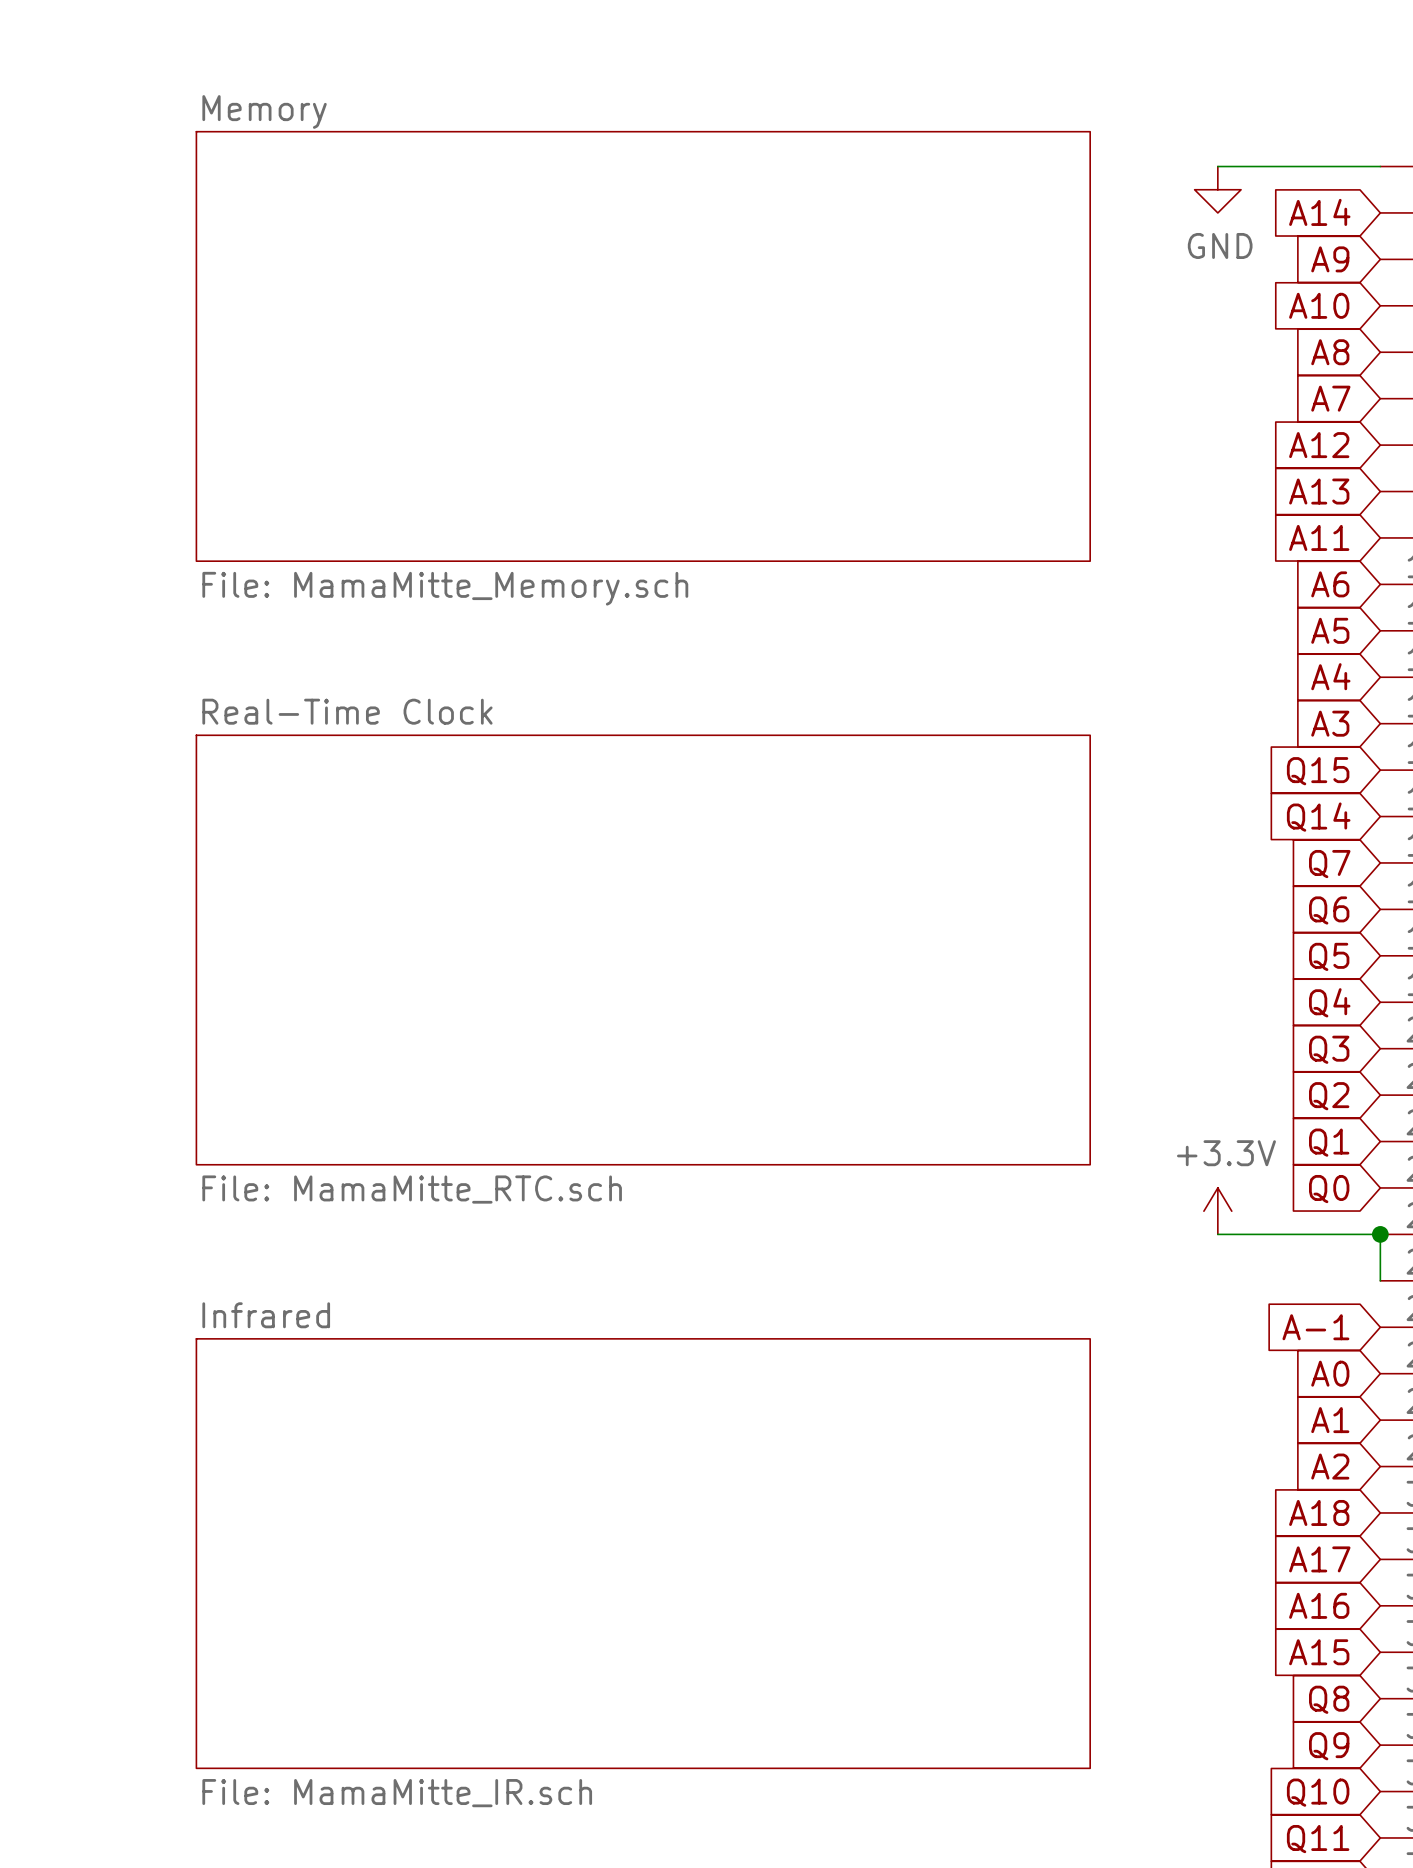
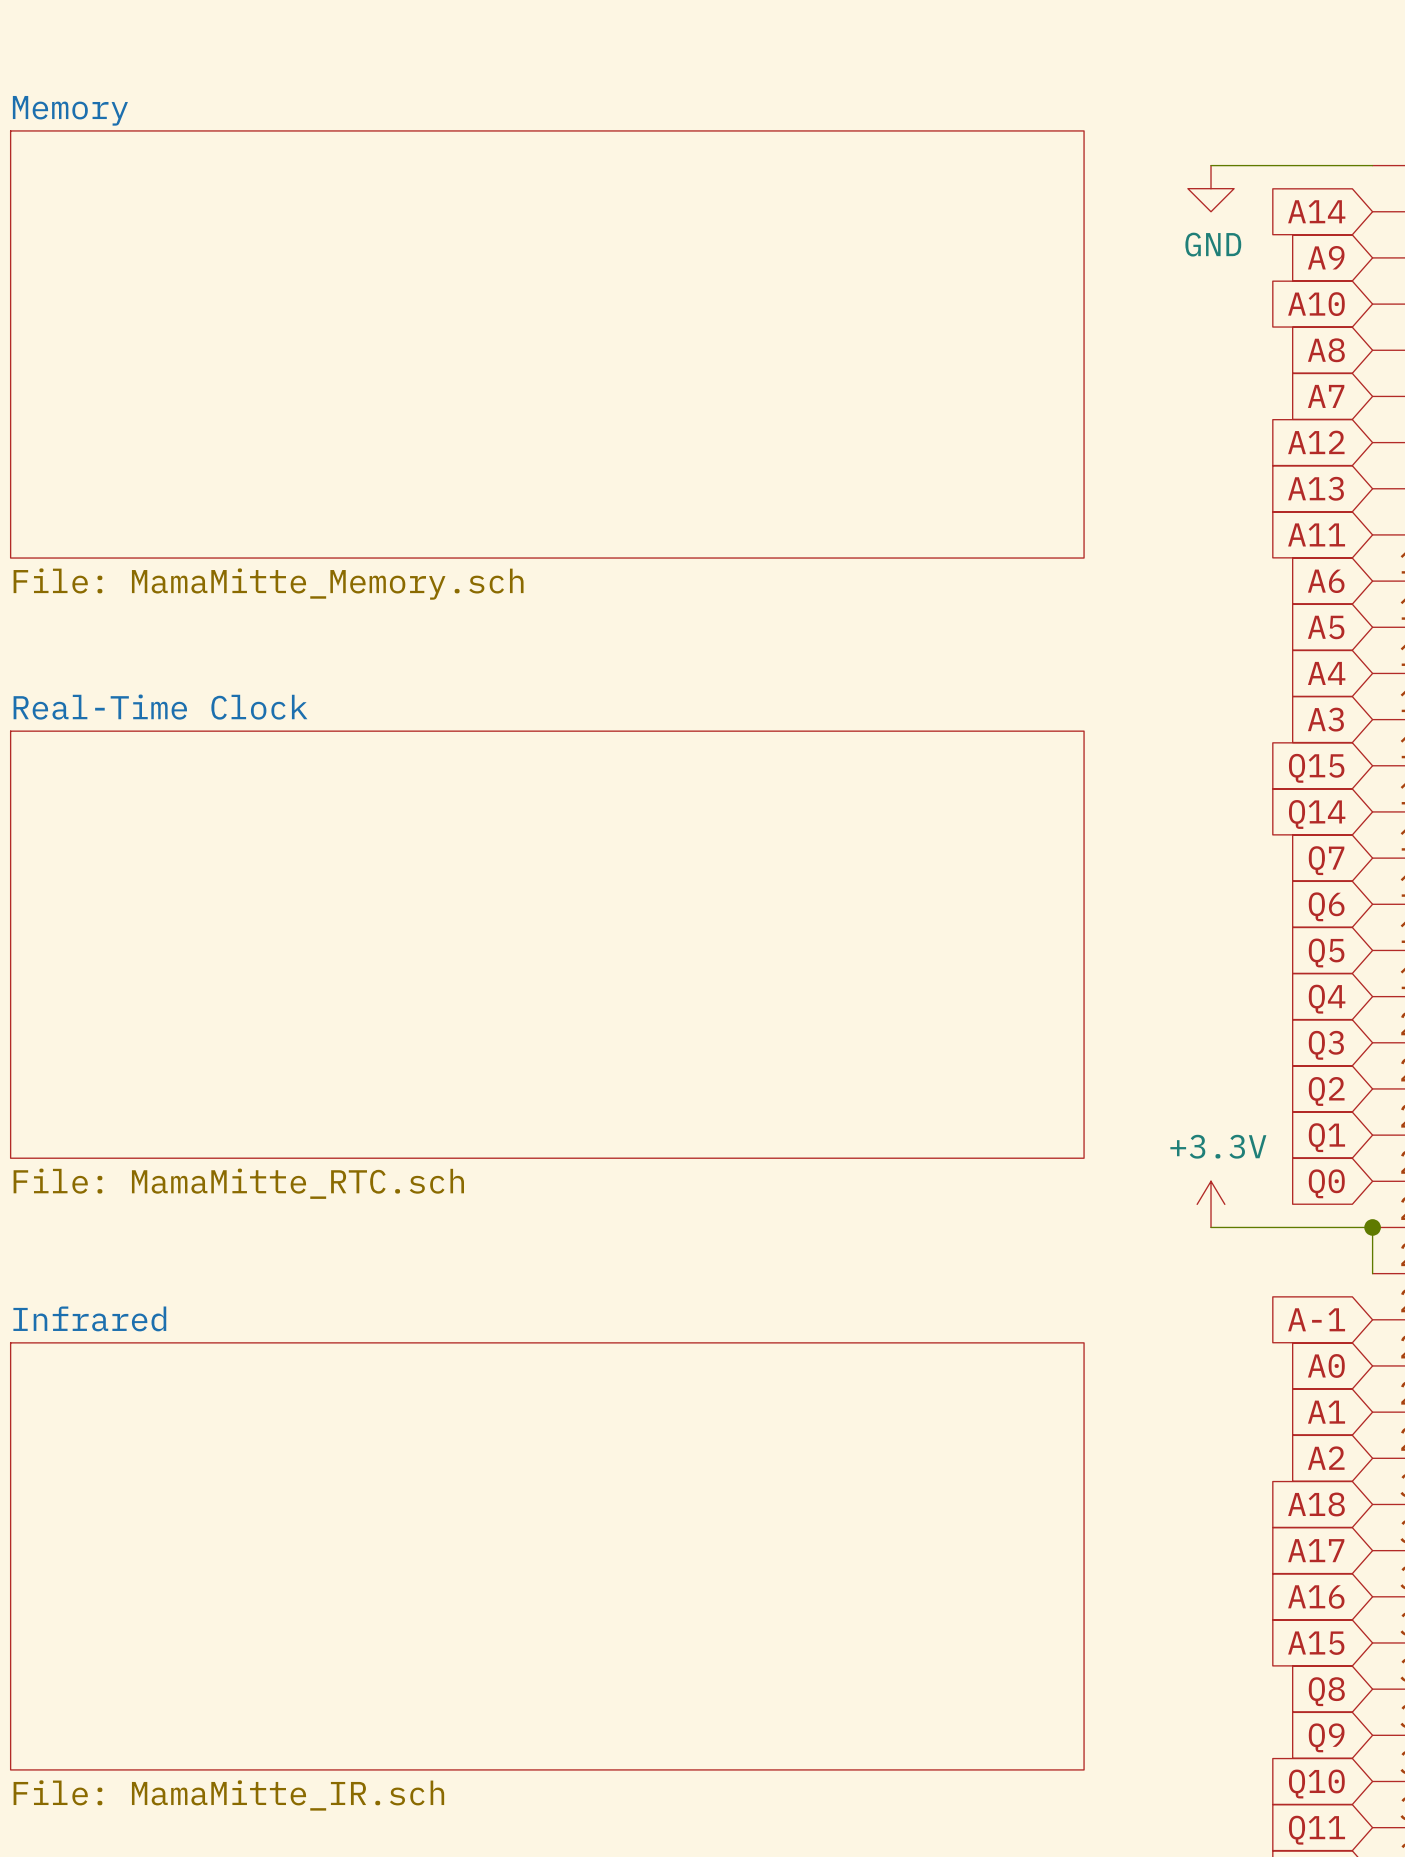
sheet Memory: none -> File: MamaMitte_Memory.sch (547, 344)
sheet Memory: File: MamaMitte_Memory.sch (643, 346) -> none
sheet Real-Time Clock: none -> File: MamaMitte_RTC.sch (547, 944)
sheet Real-Time Clock: File: MamaMitte_RTC.sch (643, 950) -> none
sheet Infrared: File: MamaMitte_IR.sch (643, 1553) -> none
sheet Infrared: none -> File: MamaMitte_IR.sch (547, 1556)

